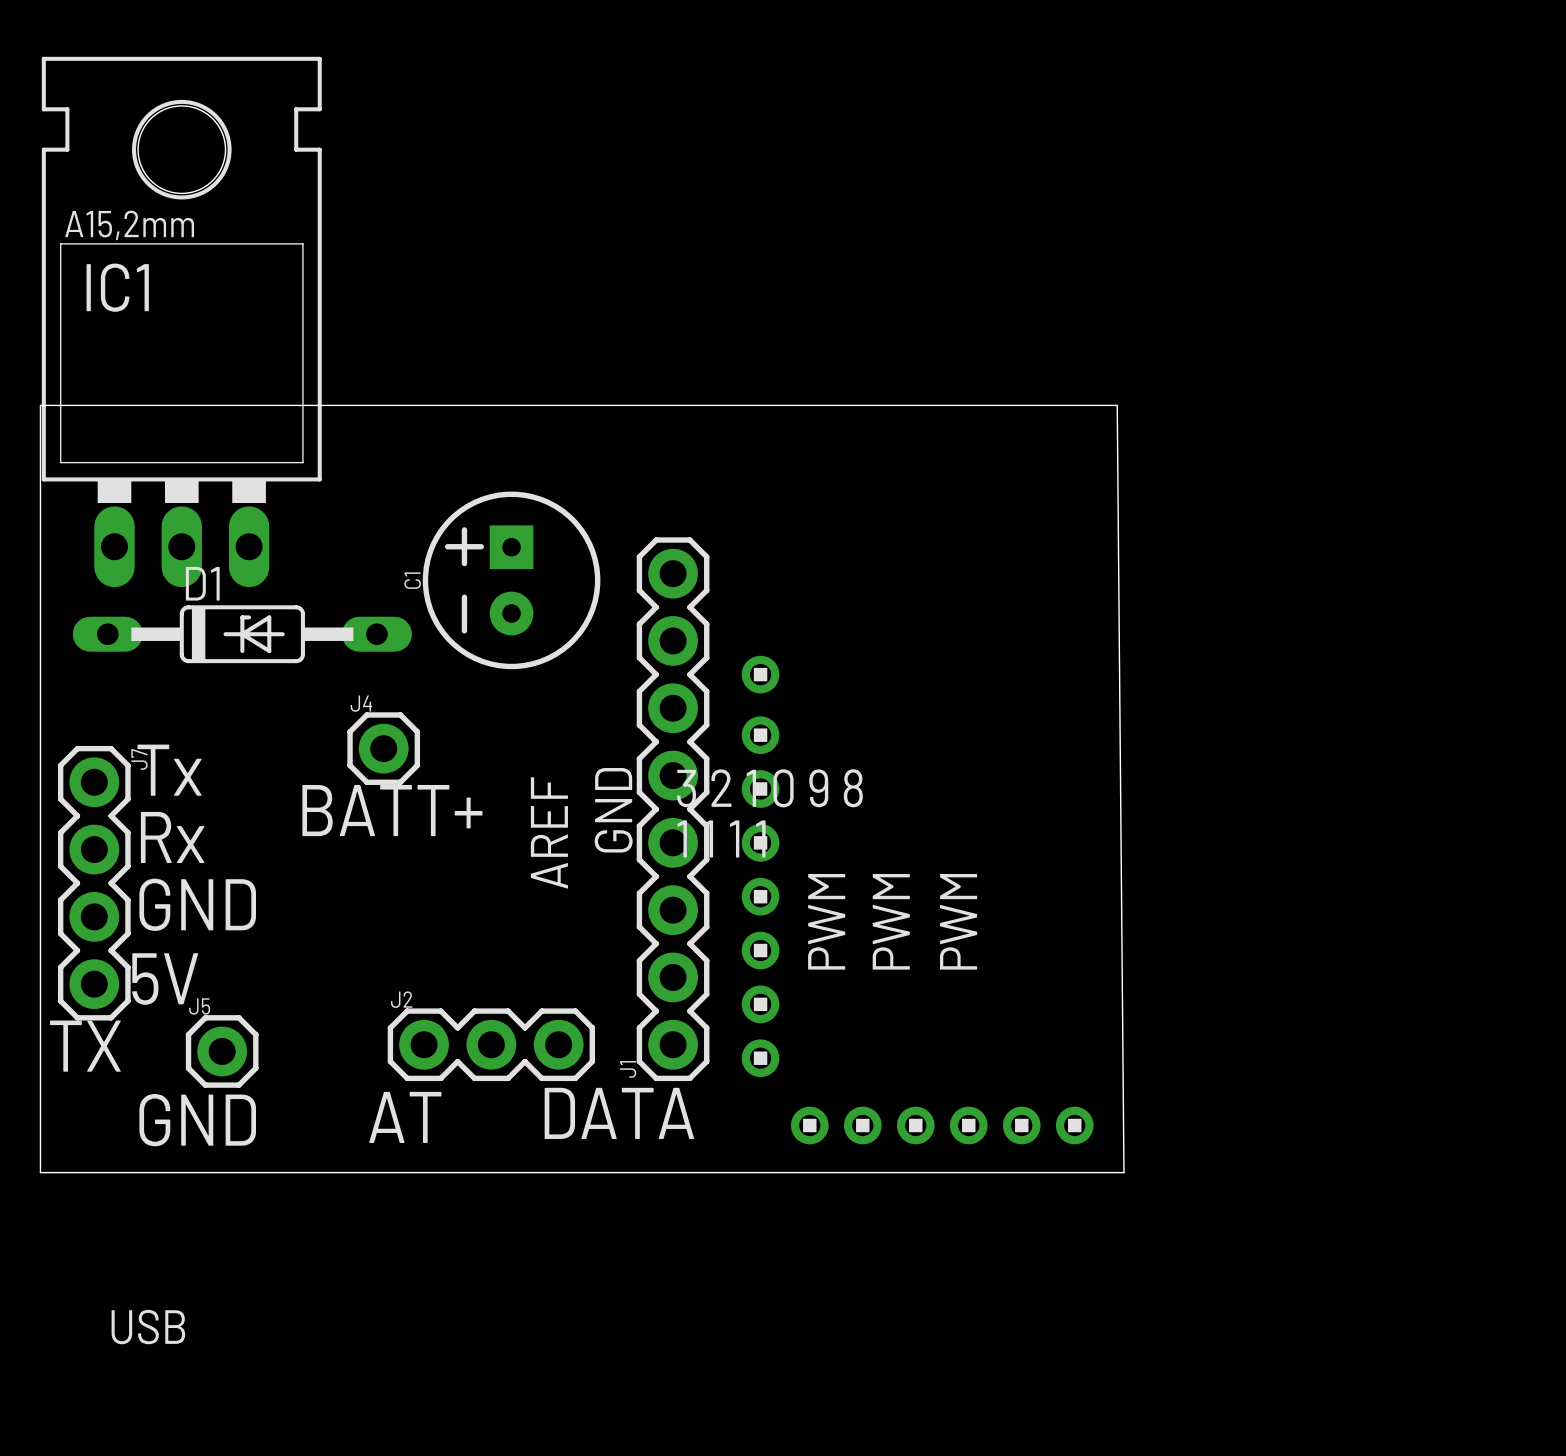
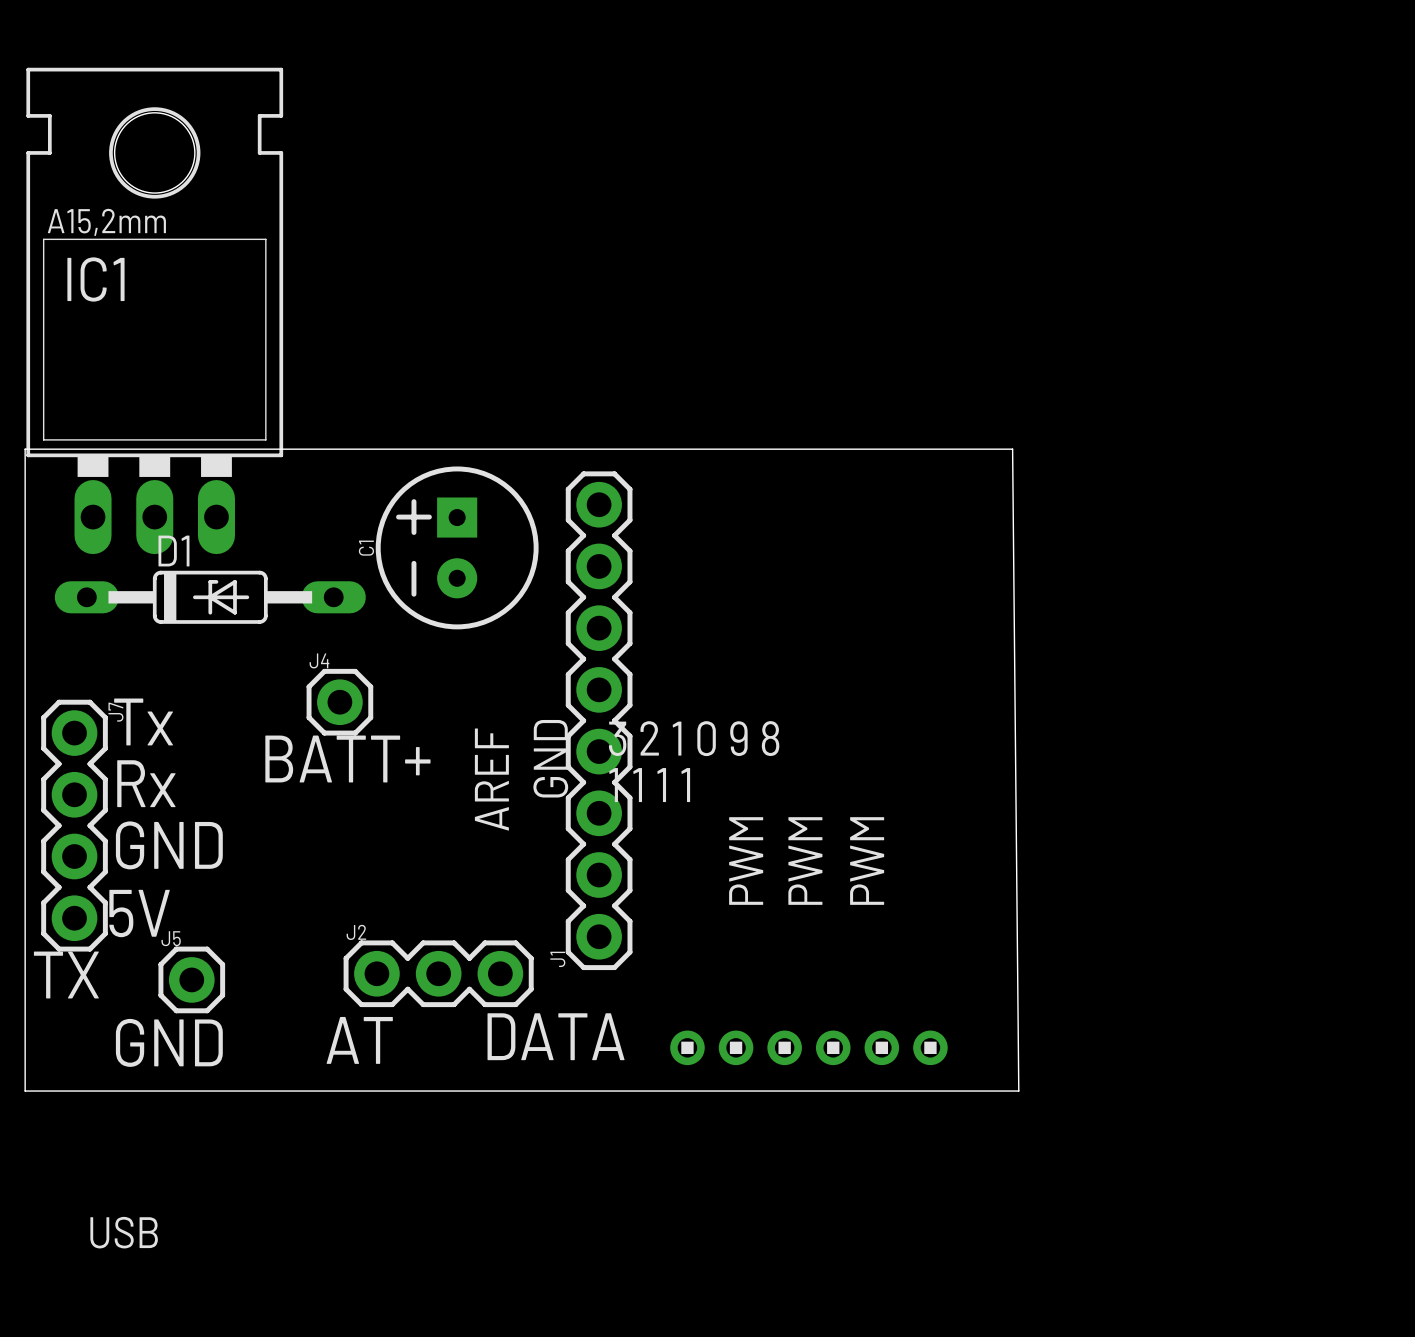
board edge: (40, 472) (40, 405) (1117, 405) (1123, 1172) -> (25, 449) (1012, 449) (1018, 1091)
part: (760, 674) -> none
part: (760, 735) -> none
part: (760, 789) -> none
J1 position: (673, 809) -> (599, 720)
part: (760, 842) -> none
part: (760, 896) -> none
part: (760, 950) -> none
part: (760, 1004) -> none
part: (760, 1058) -> none
part position: (942, 1125) -> (808, 1047)

